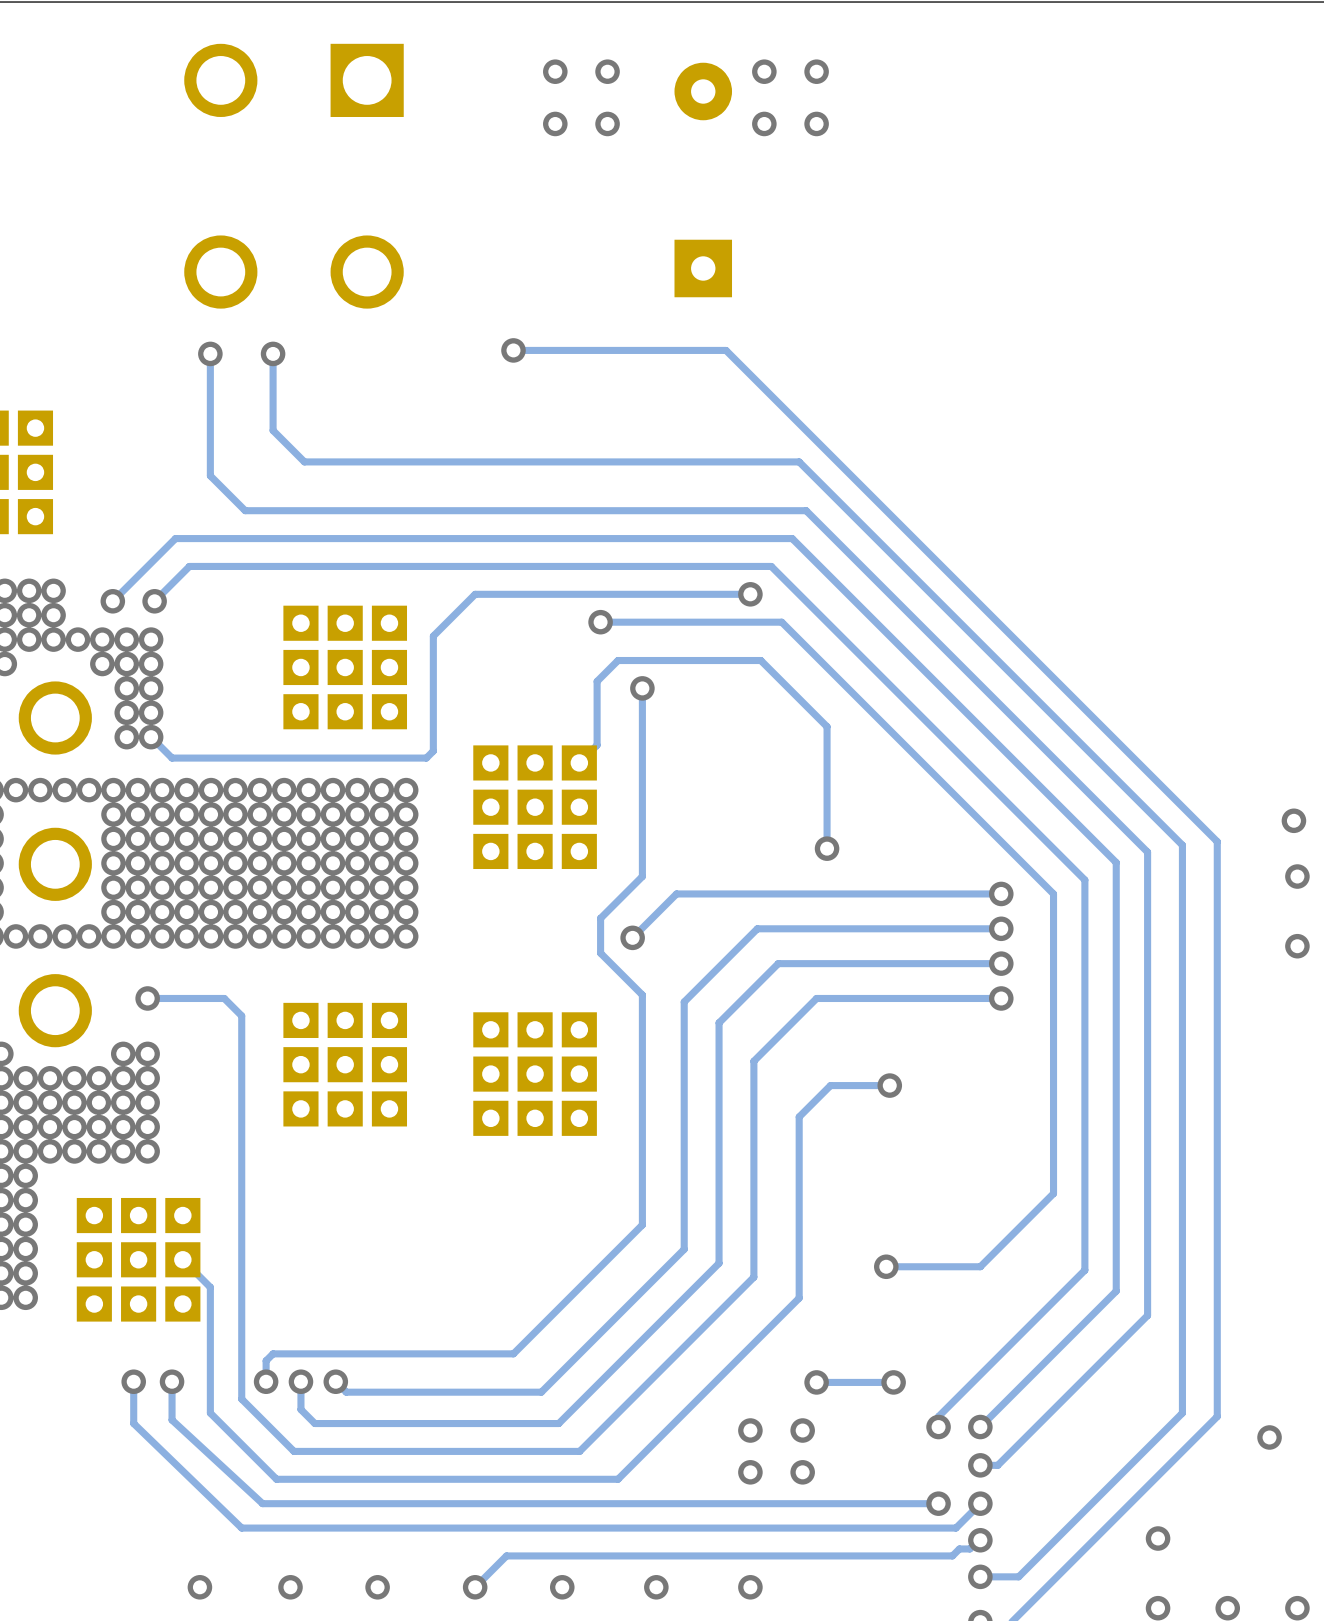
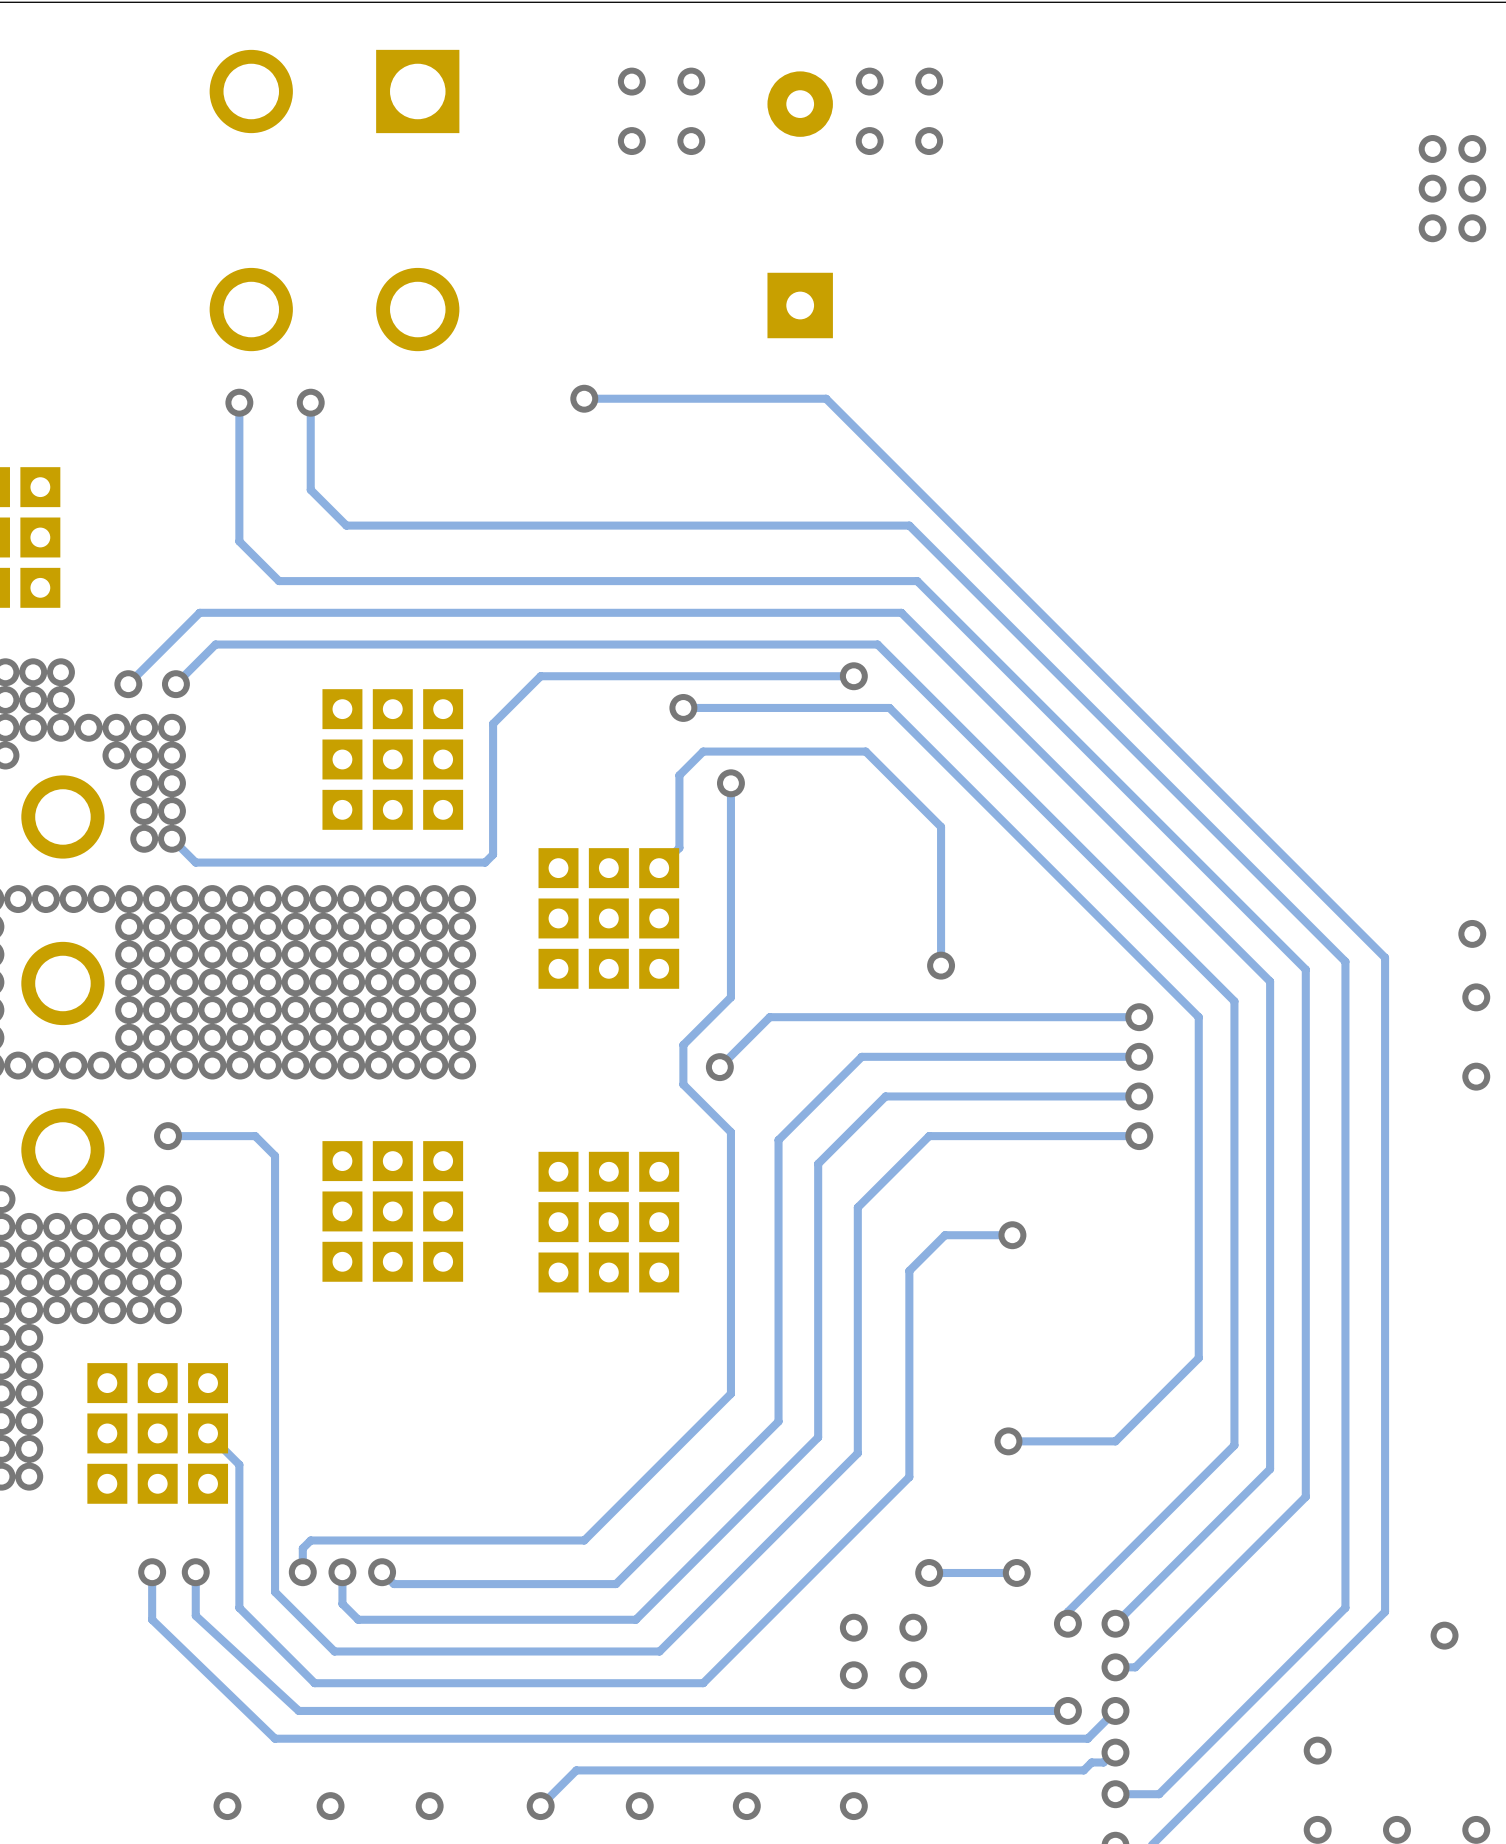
via: none -> (1432, 148)
via: none -> (1472, 148)
via: none -> (1432, 188)
via: none -> (1472, 188)
via: none -> (1432, 228)
via: none -> (1472, 228)

